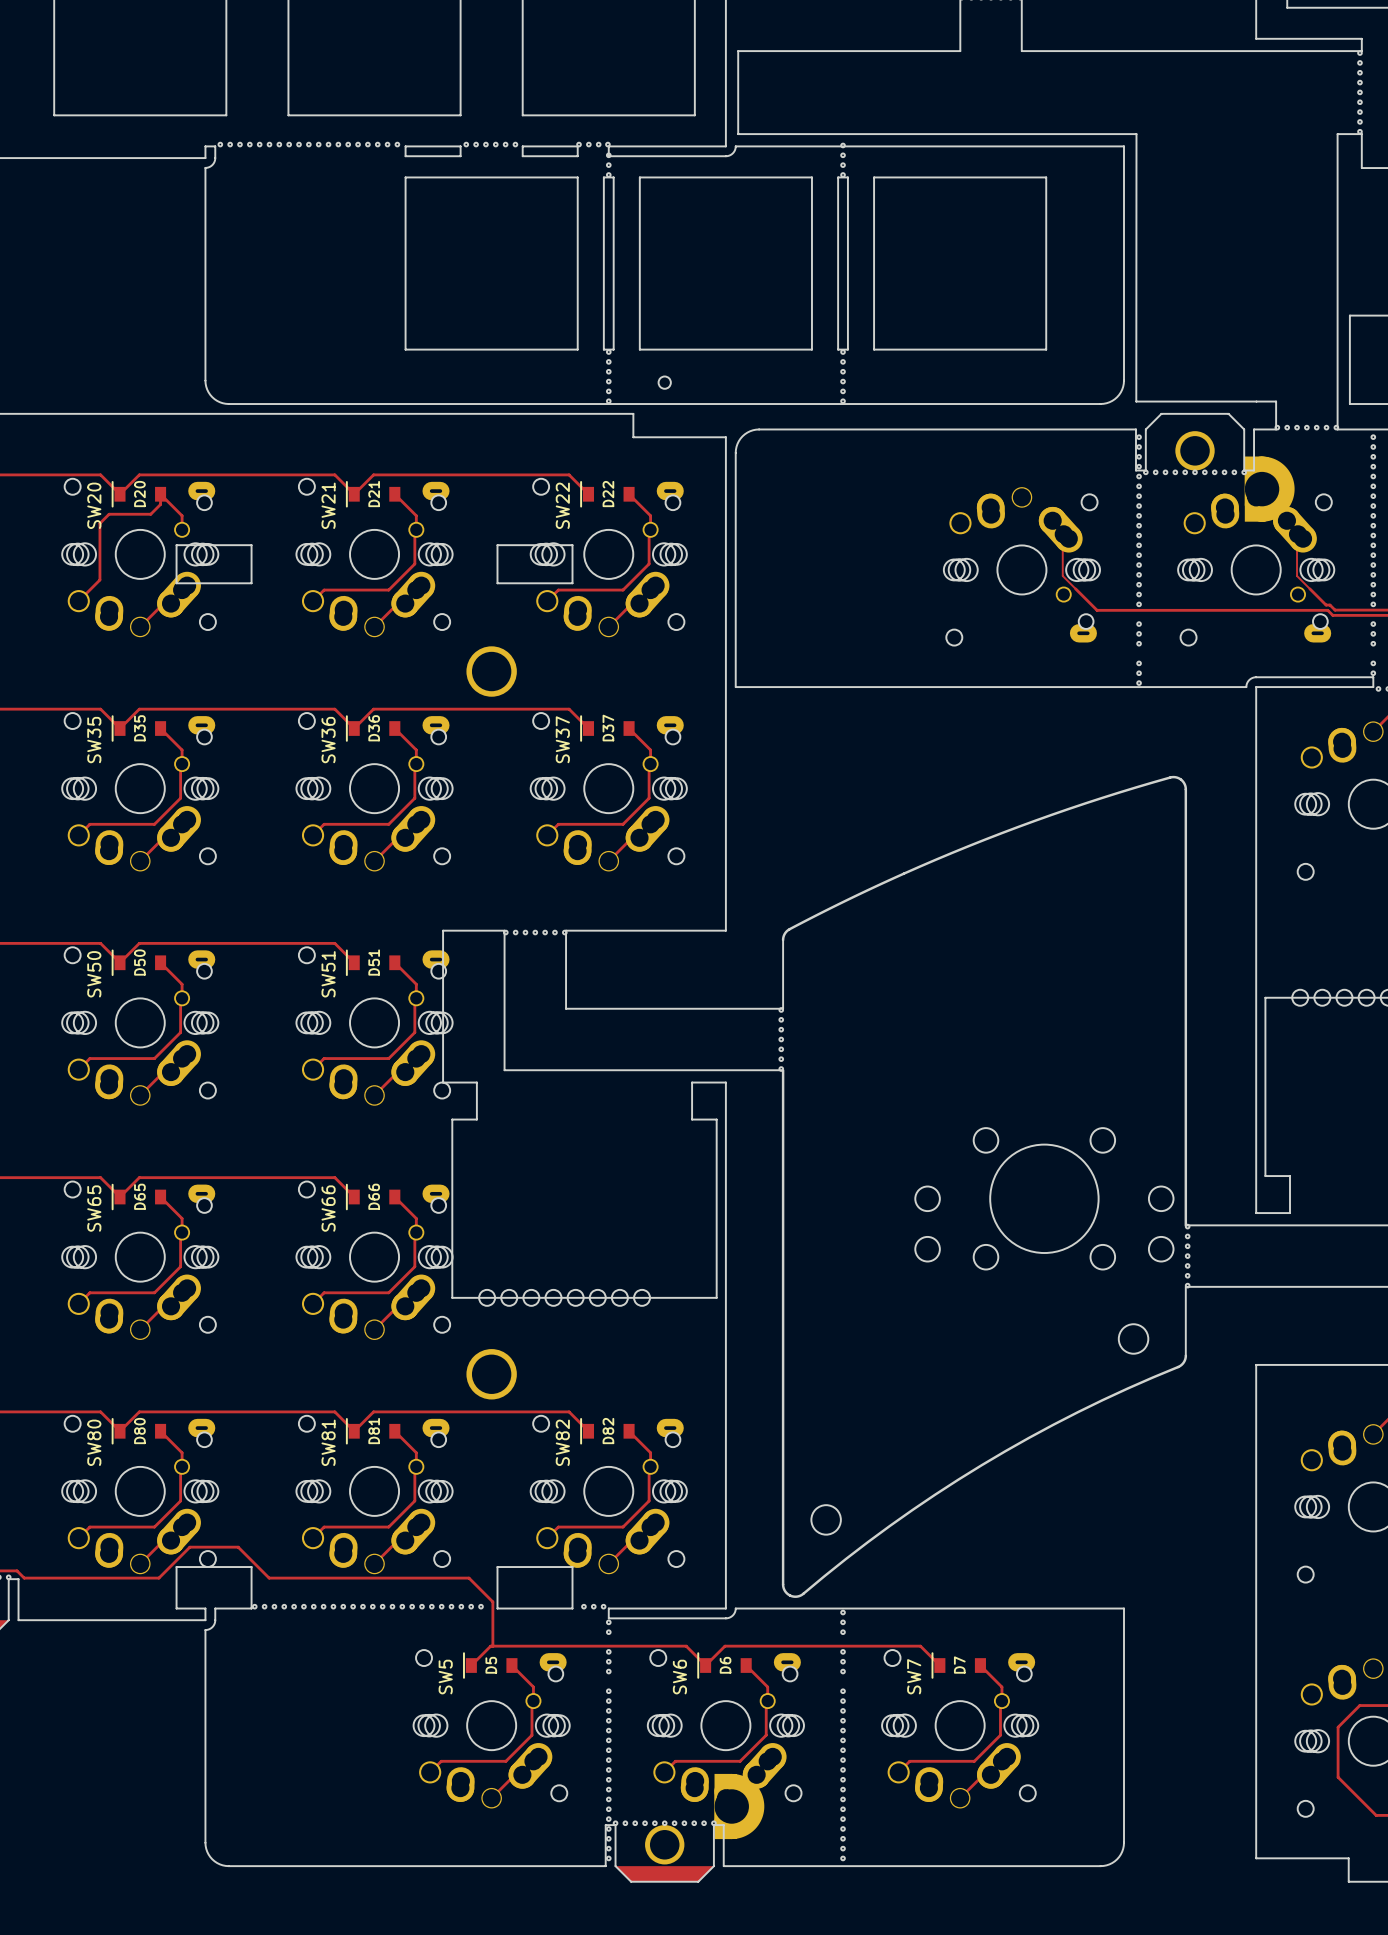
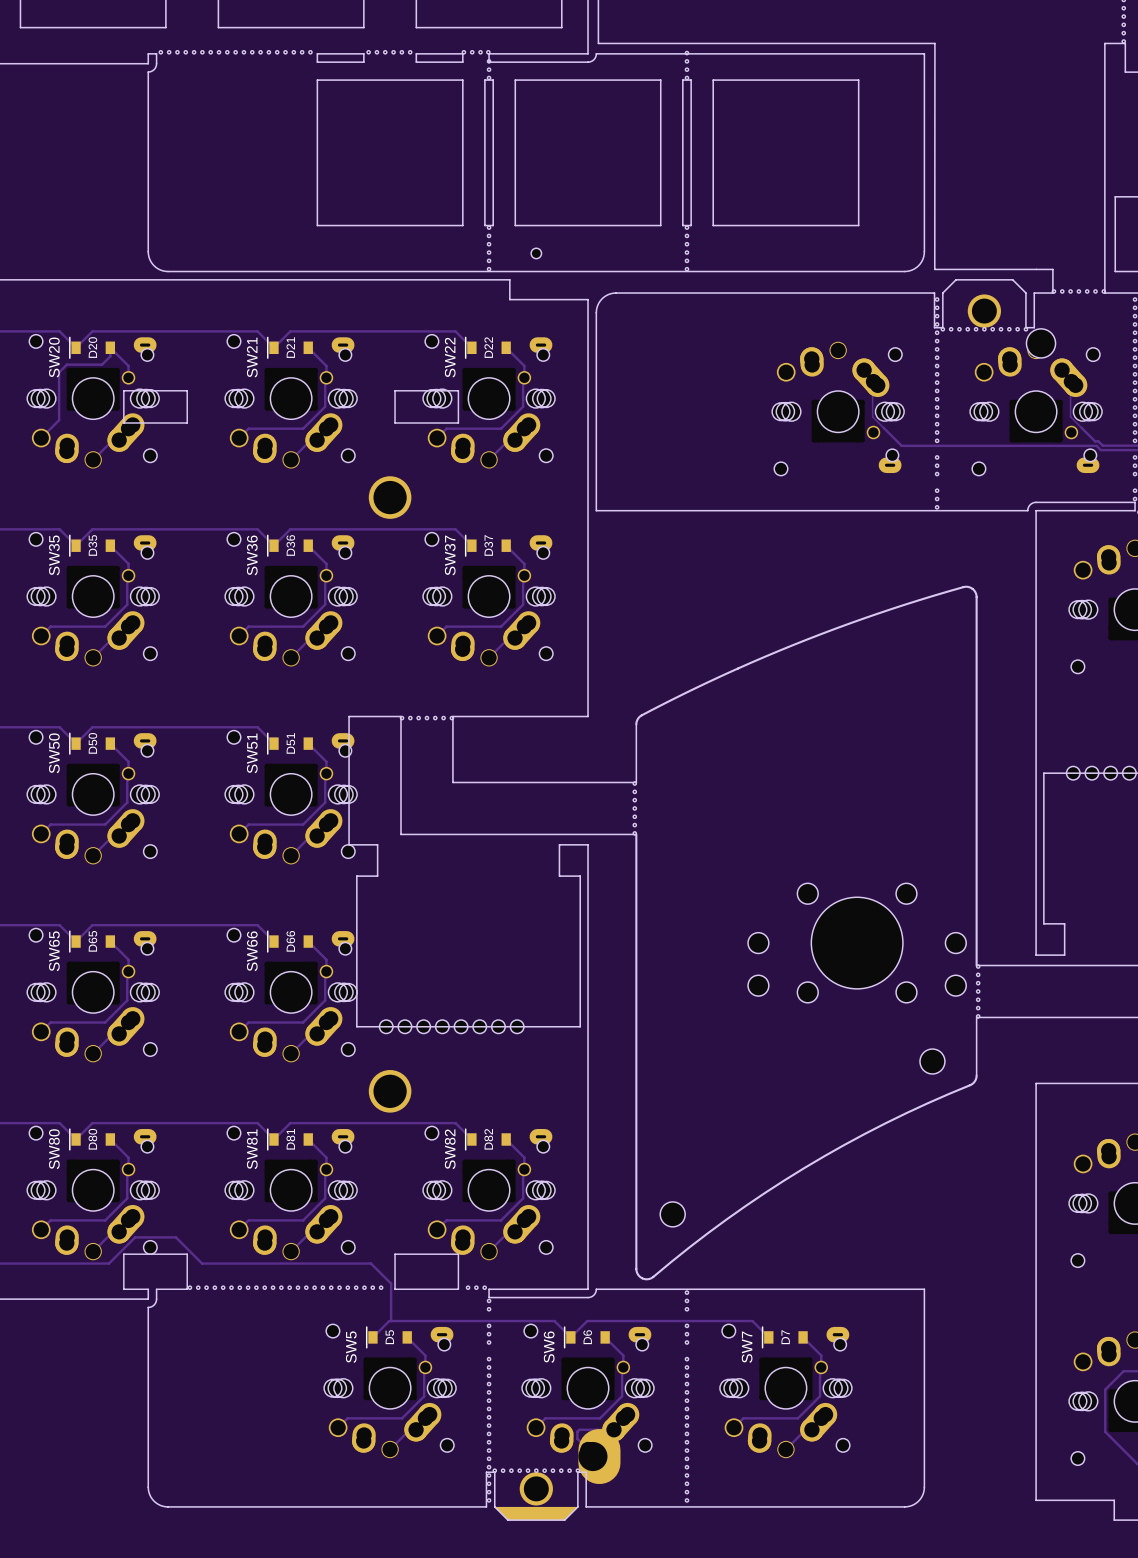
part footprint: [1244, 456, 1295, 522] -> [1026, 328, 1056, 358]
part footprint: [714, 1773, 765, 1840] -> [578, 1429, 621, 1485]
track: none -> (613, 1429) (579, 1429) (577, 1431) (577, 1438) (588, 1449)

